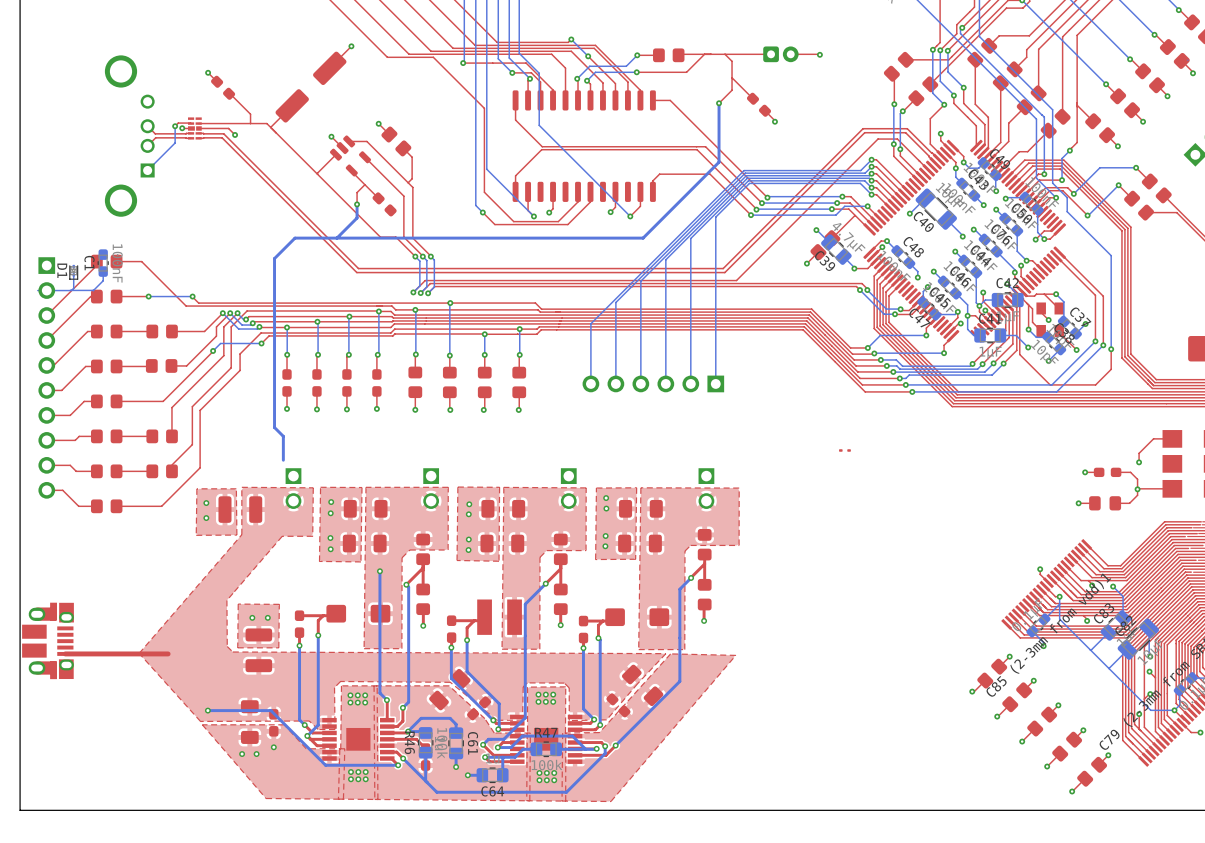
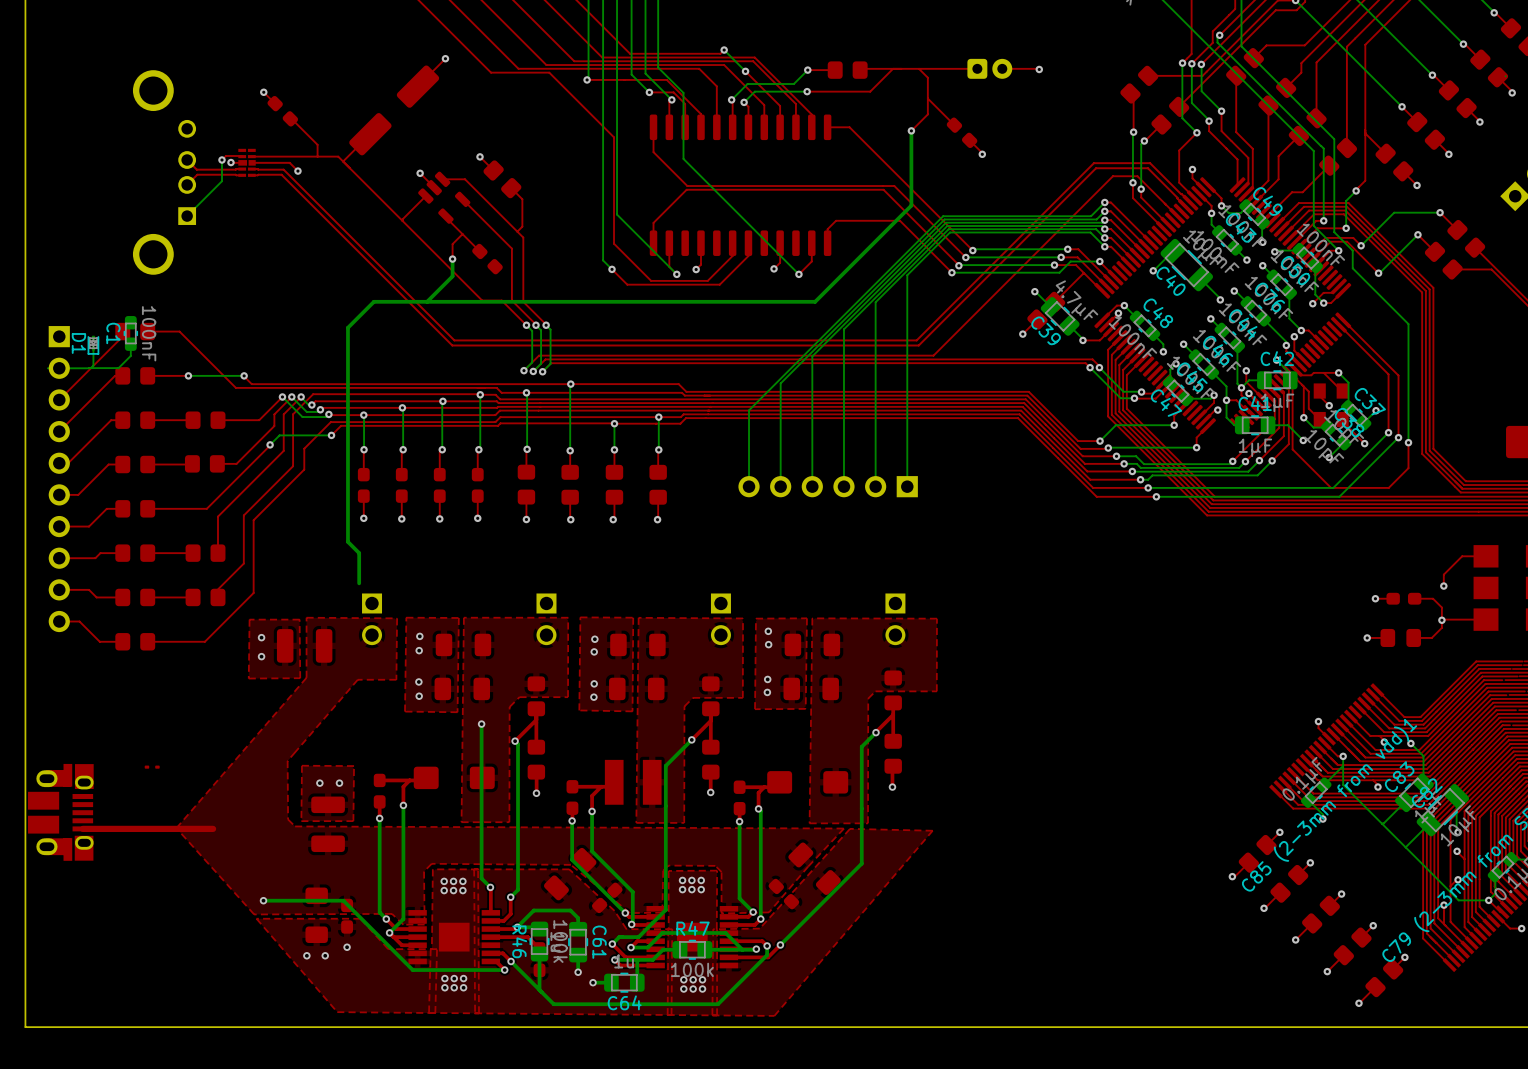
part: (844, 450) -> none
part: none -> (152, 767)

